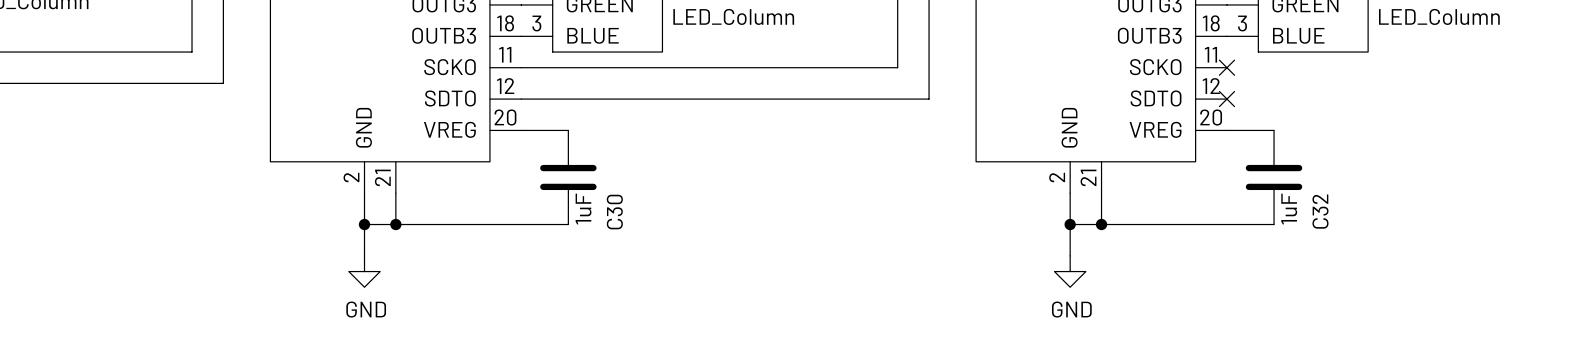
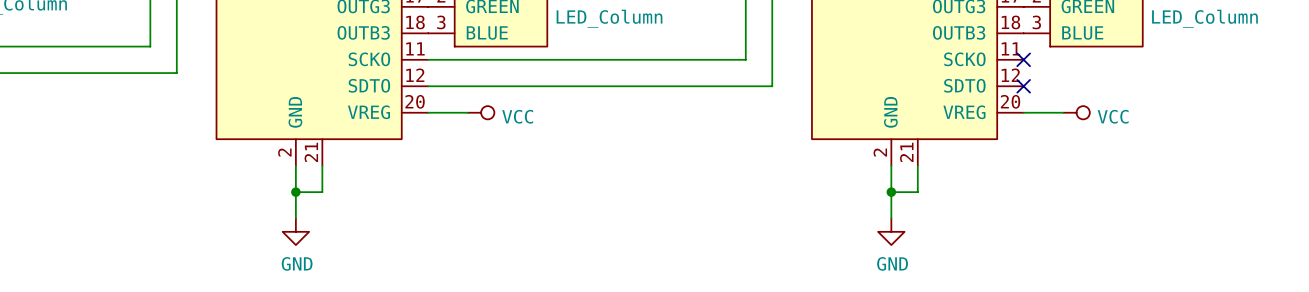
power symbol: none -> VCC (481, 112)
power symbol: none -> VCC (1076, 112)
C30: 1uF (568, 177) -> none
C32: 1uF (1274, 177) -> none
wire: (395, 224) (568, 224) -> none
junction: (395, 224) -> none
wire: (1101, 224) (1274, 224) -> none
junction: (1101, 224) -> none

